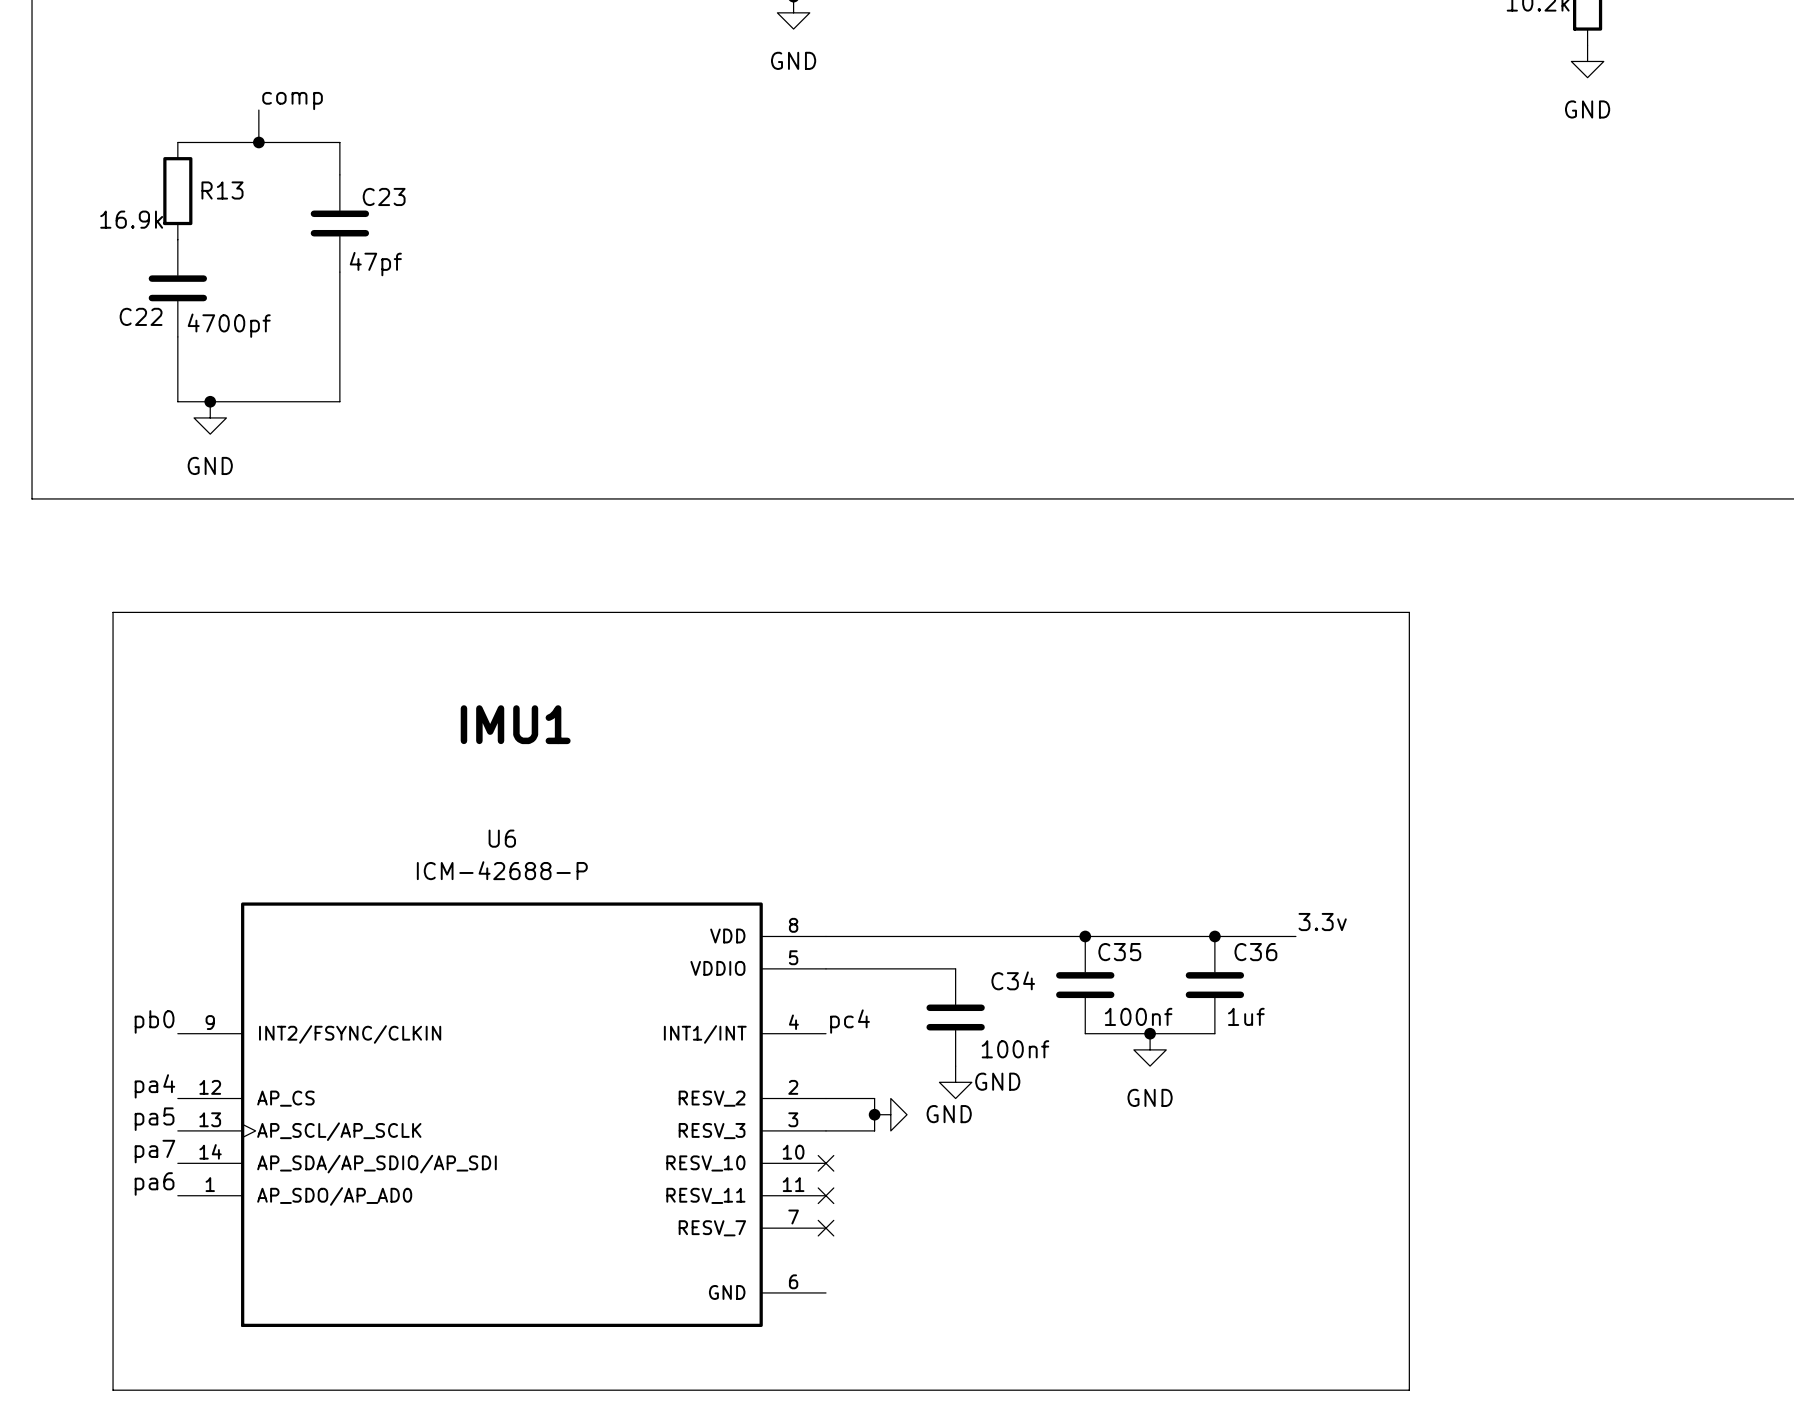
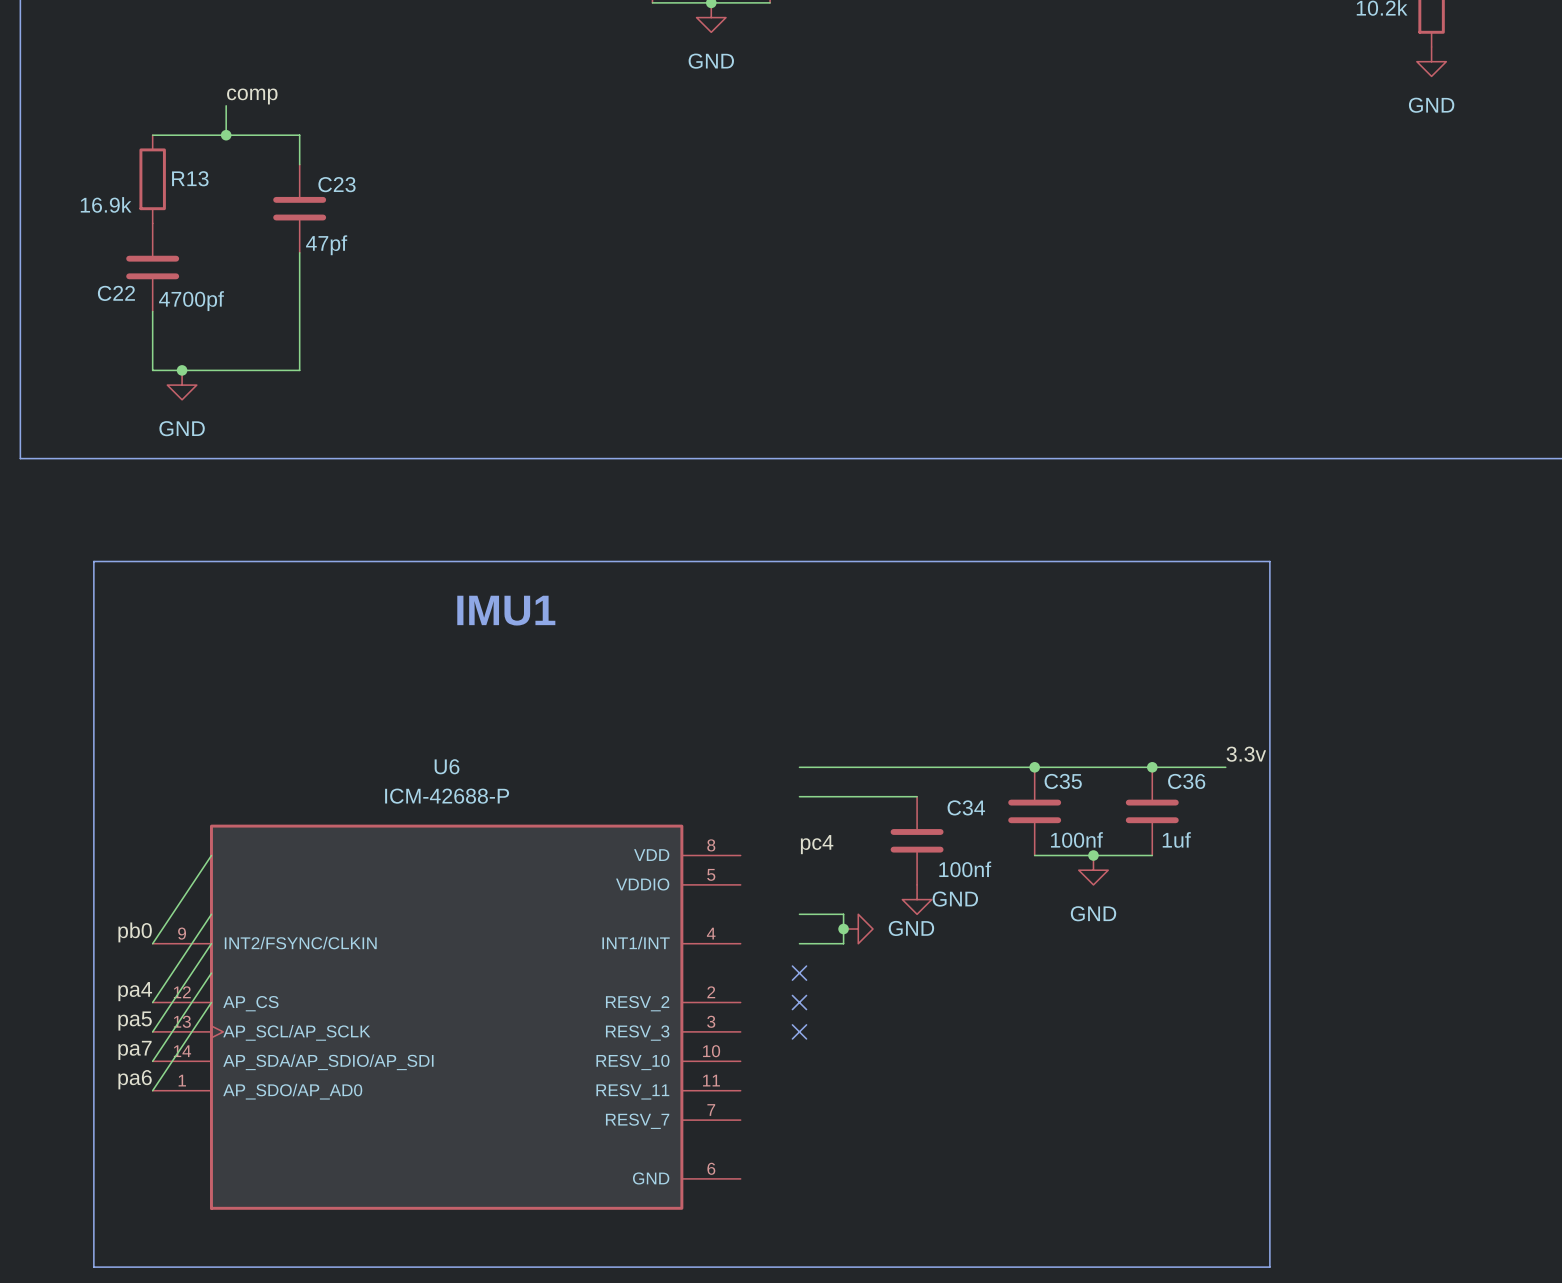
text position: IMU1 (515, 724) -> IMU1 (506, 610)
wire: none -> (799, 767) (1225, 767)
junction: none -> (1034, 767)
junction: none -> (1152, 767)
label position: 3.3v (1322, 922) -> 3.3v (1246, 754)
wire: none -> (211, 855) (152, 943)
wire: (826, 936) (1150, 936) -> none
junction: (1085, 936) -> none
wire: (1279, 936) (1295, 936) -> none
power symbol: none -> GND (1093, 870)
wire: (826, 968) (955, 968) -> (799, 796) (917, 796)
power symbol: none -> GND (917, 899)
C35 position: (1085, 985) -> (1034, 811)
C36 position: (1214, 985) -> (1152, 811)
wire: none -> (211, 914) (152, 1002)
junction: none -> (843, 929)
power symbol: none -> GND (858, 929)
C34 position: (955, 1017) -> (917, 840)
label position: pc4 (850, 1021) -> pc4 (817, 844)
wire: none -> (211, 943) (152, 1031)
wire: (1085, 1033) (1214, 1033) -> none
junction: (1150, 1033) -> none
power symbol: GND (1150, 1049) -> none
wire: none -> (211, 973) (152, 1061)
no-connect mark: none -> (799, 973)
power symbol: GND (955, 1082) -> none
wire: none -> (211, 1002) (152, 1090)
wire: (826, 1098) (874, 1098) (874, 1130) (826, 1130) -> (799, 914) (843, 914) (843, 943) (799, 943)
no-connect mark: none -> (799, 1002)
junction: (874, 1114) -> none
power symbol: GND (890, 1114) -> none
no-connect mark: none -> (799, 1031)
no-connect mark: (826, 1163) -> none
no-connect mark: (826, 1195) -> none
no-connect mark: (826, 1228) -> none

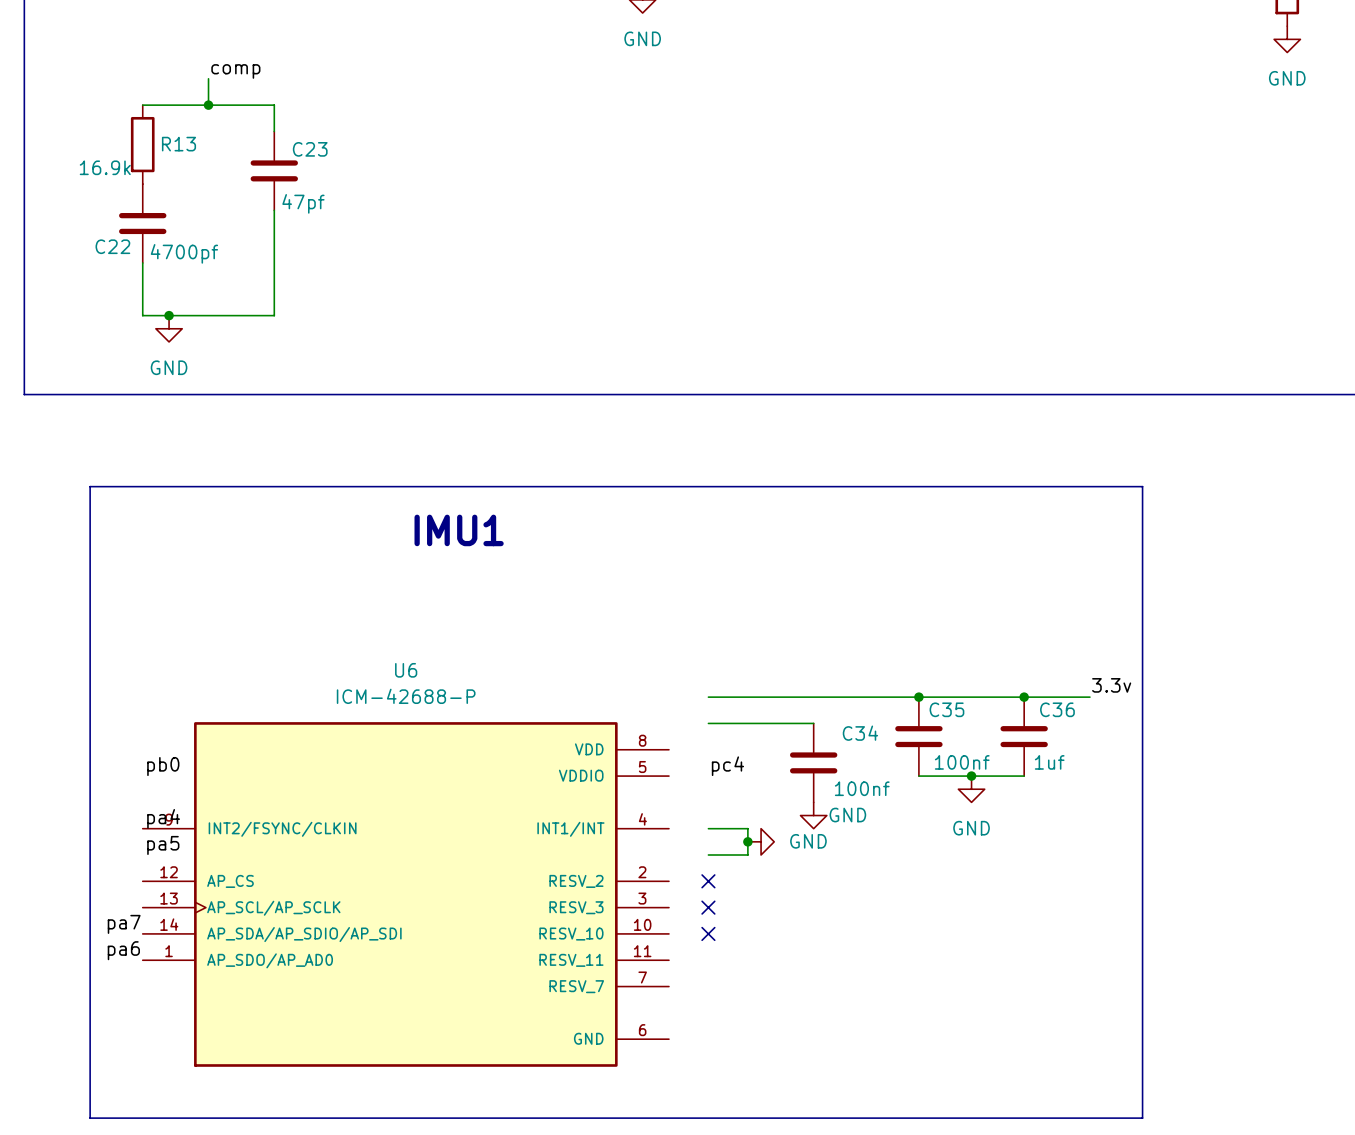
label position: 3.3v (1246, 754) -> 3.3v (1111, 685)
wire: (799, 767) (1225, 767) -> none
junction position: (1034, 767) -> (918, 697)
junction position: (1152, 767) -> (1024, 697)
wire: none -> (708, 697) (721, 697)
wire: none -> (826, 697) (1089, 697)
C35 position: (1034, 811) -> (918, 736)
C36 position: (1152, 811) -> (1024, 736)
wire: none -> (708, 723) (813, 723)
C34 position: (917, 840) -> (813, 762)
label position: pc4 (817, 844) -> pc4 (727, 766)
wire: (211, 855) (152, 943) -> none
wire: (1034, 855) (1152, 855) -> (918, 776) (1024, 776)
junction position: (1093, 855) -> (971, 776)
power symbol position: GND (1093, 870) -> GND (971, 789)
power symbol: GND (917, 899) -> none
wire: (211, 914) (152, 1002) -> none
wire: (799, 914) (843, 914) (843, 943) (828, 943) -> (708, 855) (747, 855) (747, 828)
junction position: (843, 929) -> (747, 841)
power symbol: GND (858, 929) -> none
power symbol: none -> GND (813, 815)
label position: pb0 (135, 932) -> pb0 (163, 766)
wire: (211, 943) (152, 1031) -> none
wire: none -> (708, 828) (721, 828)
power symbol: none -> GND (761, 841)
wire: (211, 973) (152, 1061) -> none
no-connect mark: (799, 973) -> none
label position: pa4 (135, 991) -> pa4 (163, 818)
wire: (211, 1002) (152, 1090) -> none
no-connect mark position: (799, 1002) -> (708, 881)
label position: pa5 (135, 1021) -> pa5 (163, 845)
no-connect mark position: (799, 1031) -> (708, 907)
no-connect mark: none -> (708, 933)

